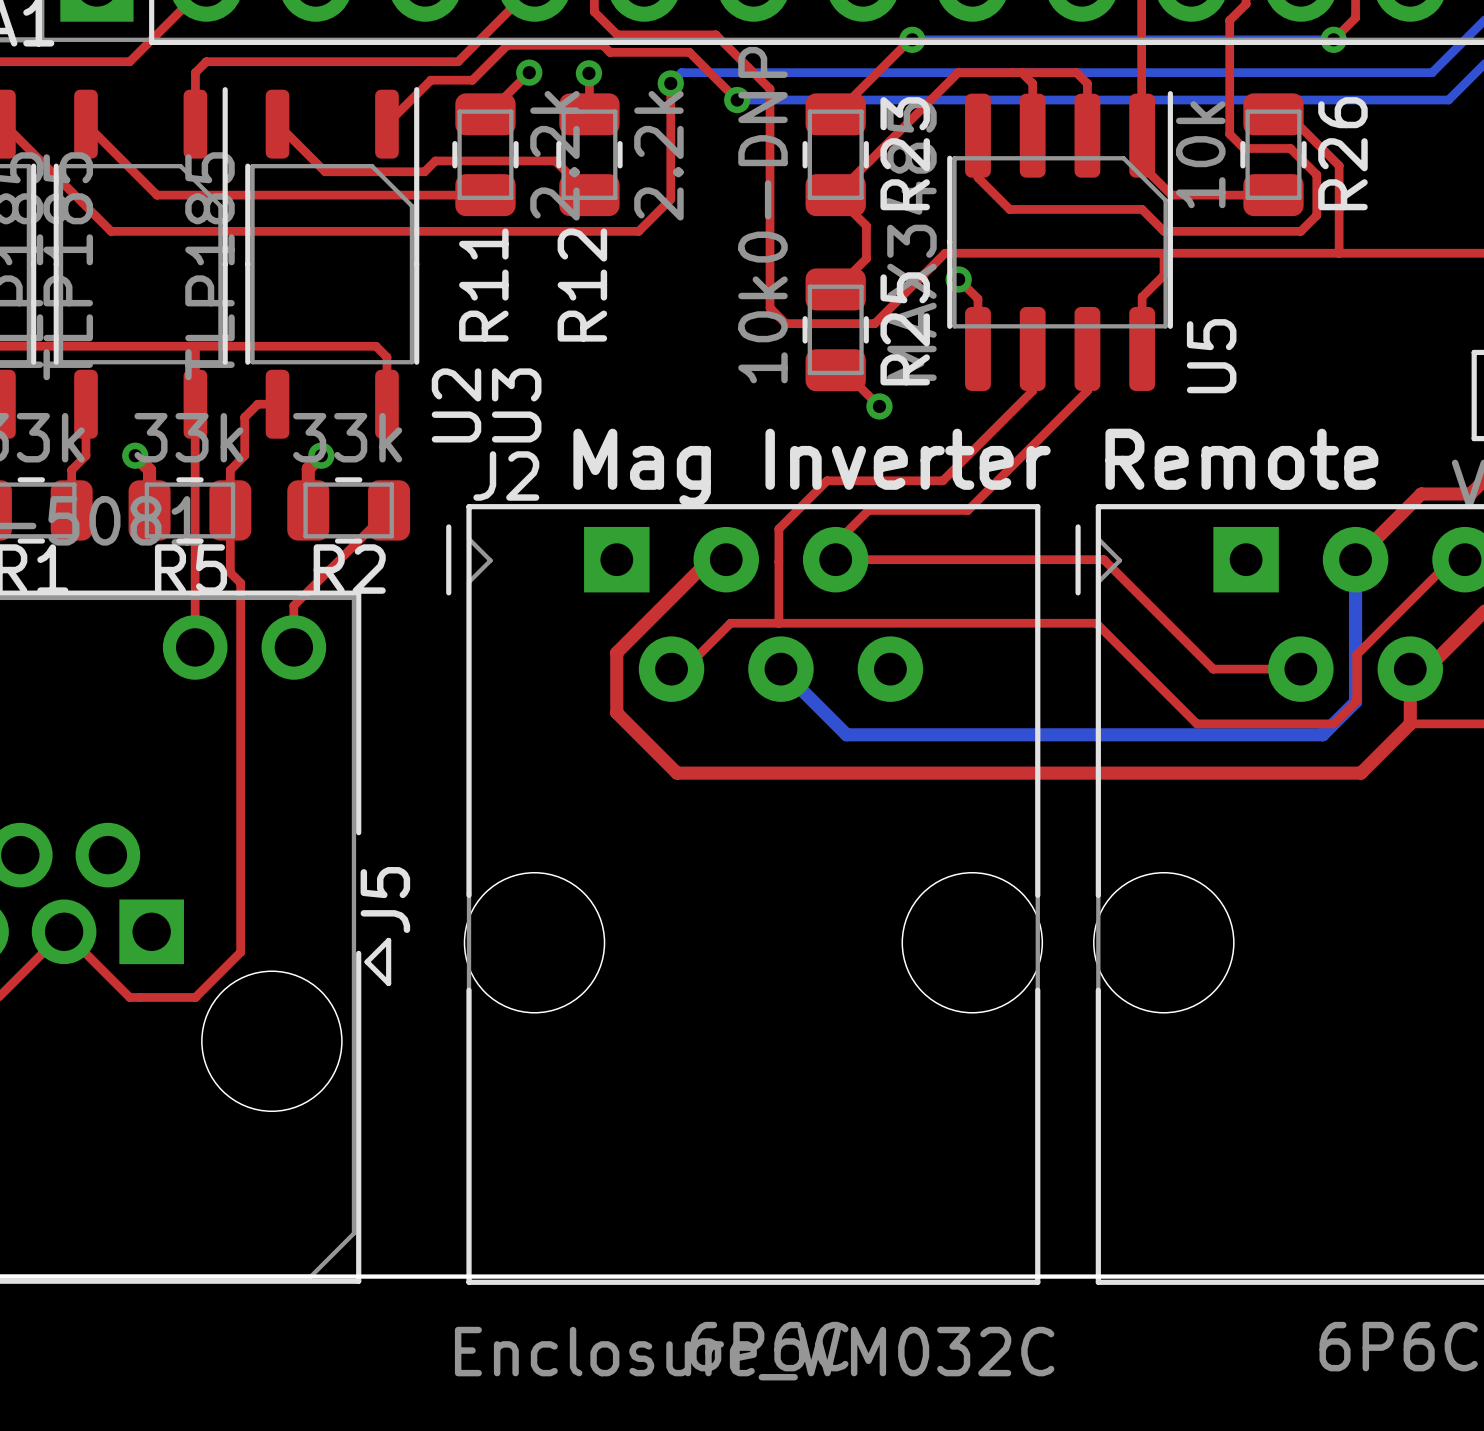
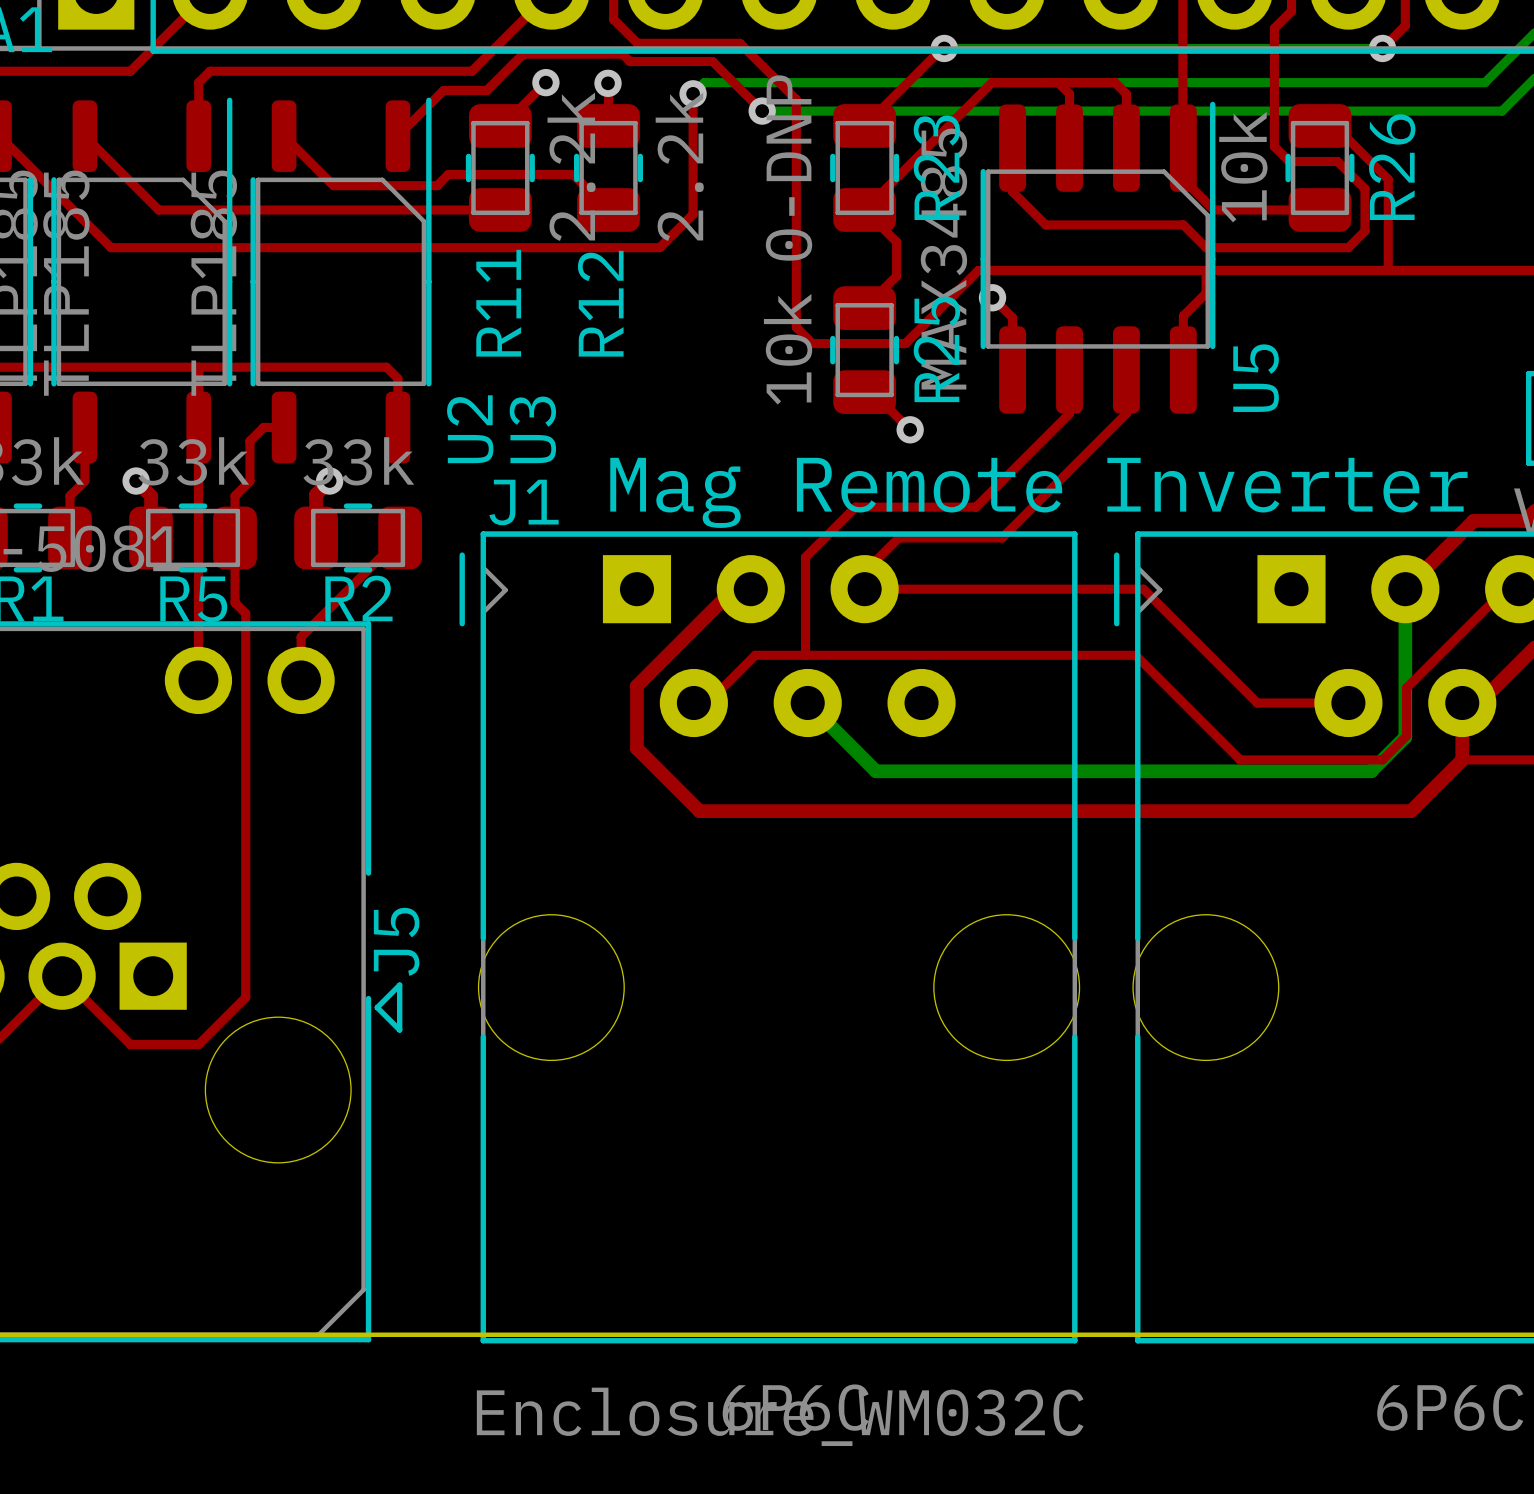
text: Remote (1241, 459) -> Inverter (1287, 485)
text: Mag Inverter (812, 467) -> Mag Remote (836, 492)
J2 name: J2 (506, 475) -> J1 (524, 502)

